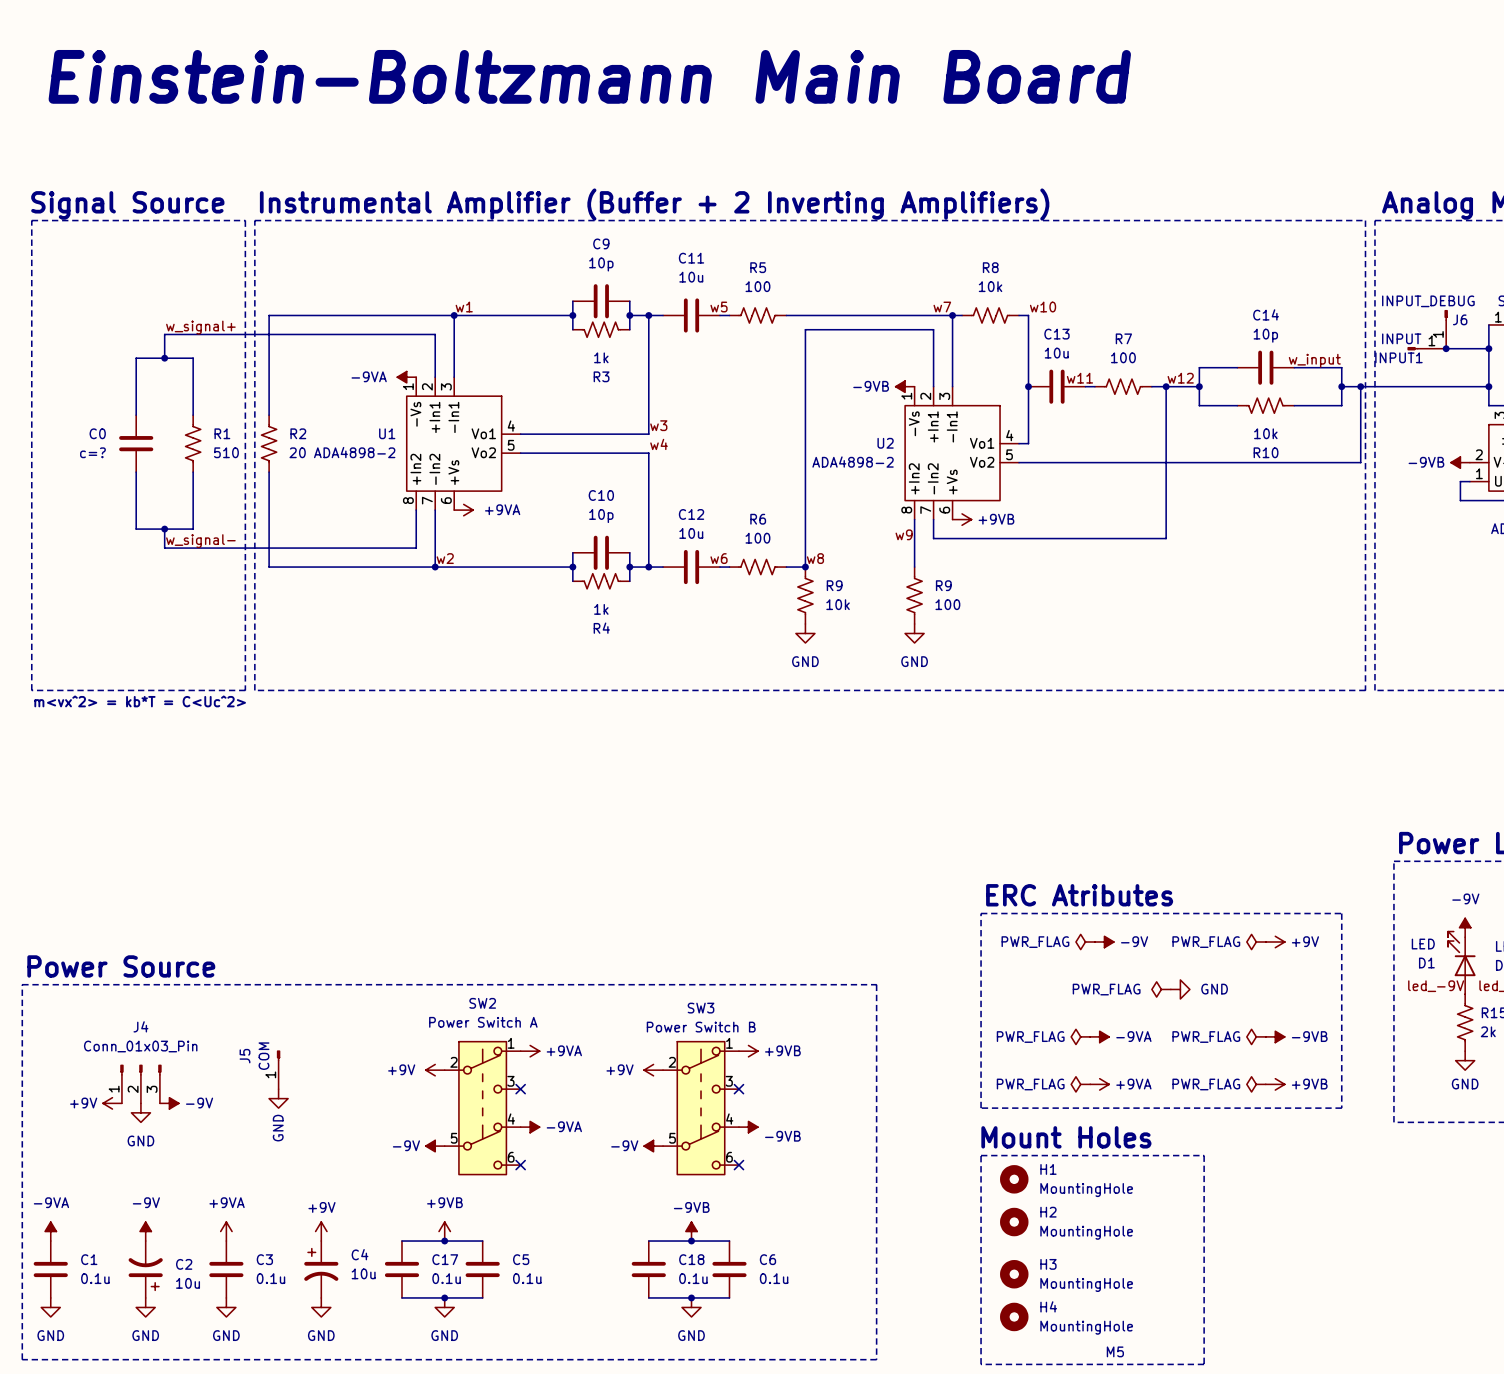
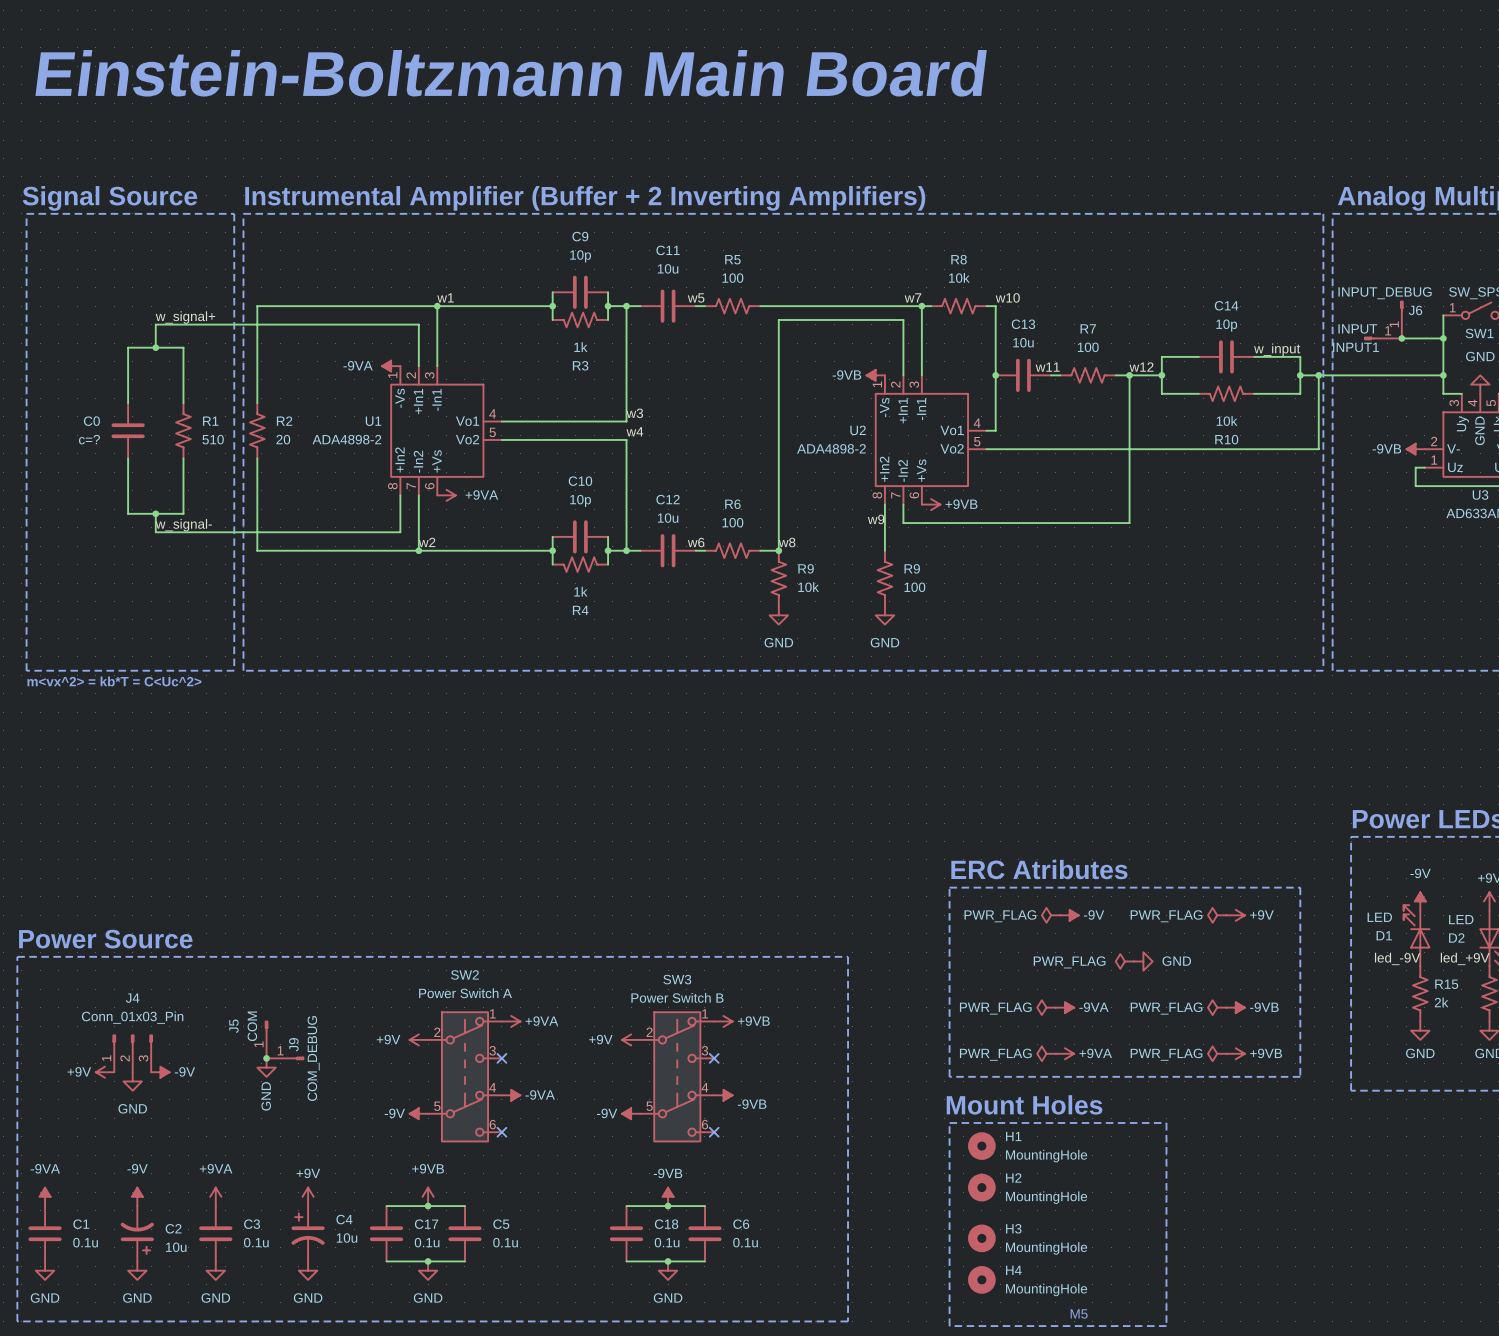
junction: none -> (266, 1058)
J9: none -> COM_DEBUG (285, 1058)

